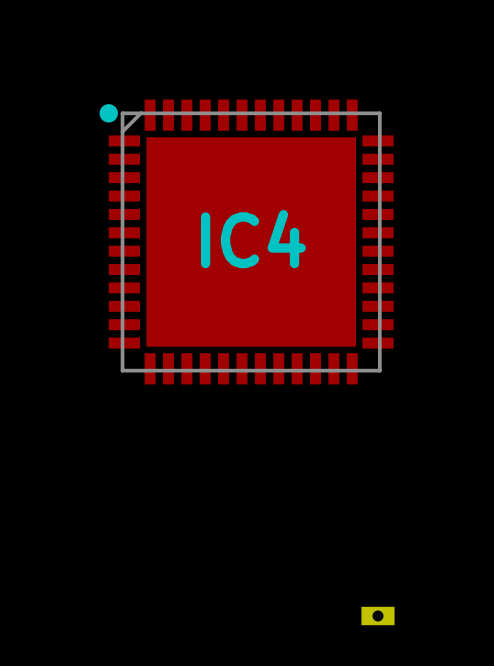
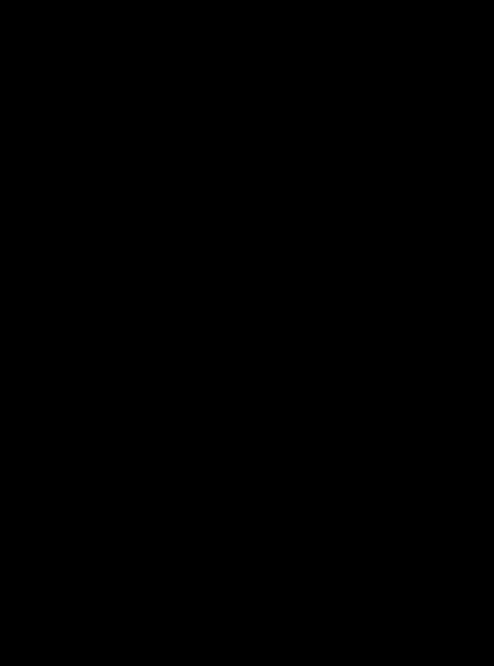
IC4: (246, 241) -> none
part: (377, 616) -> none

